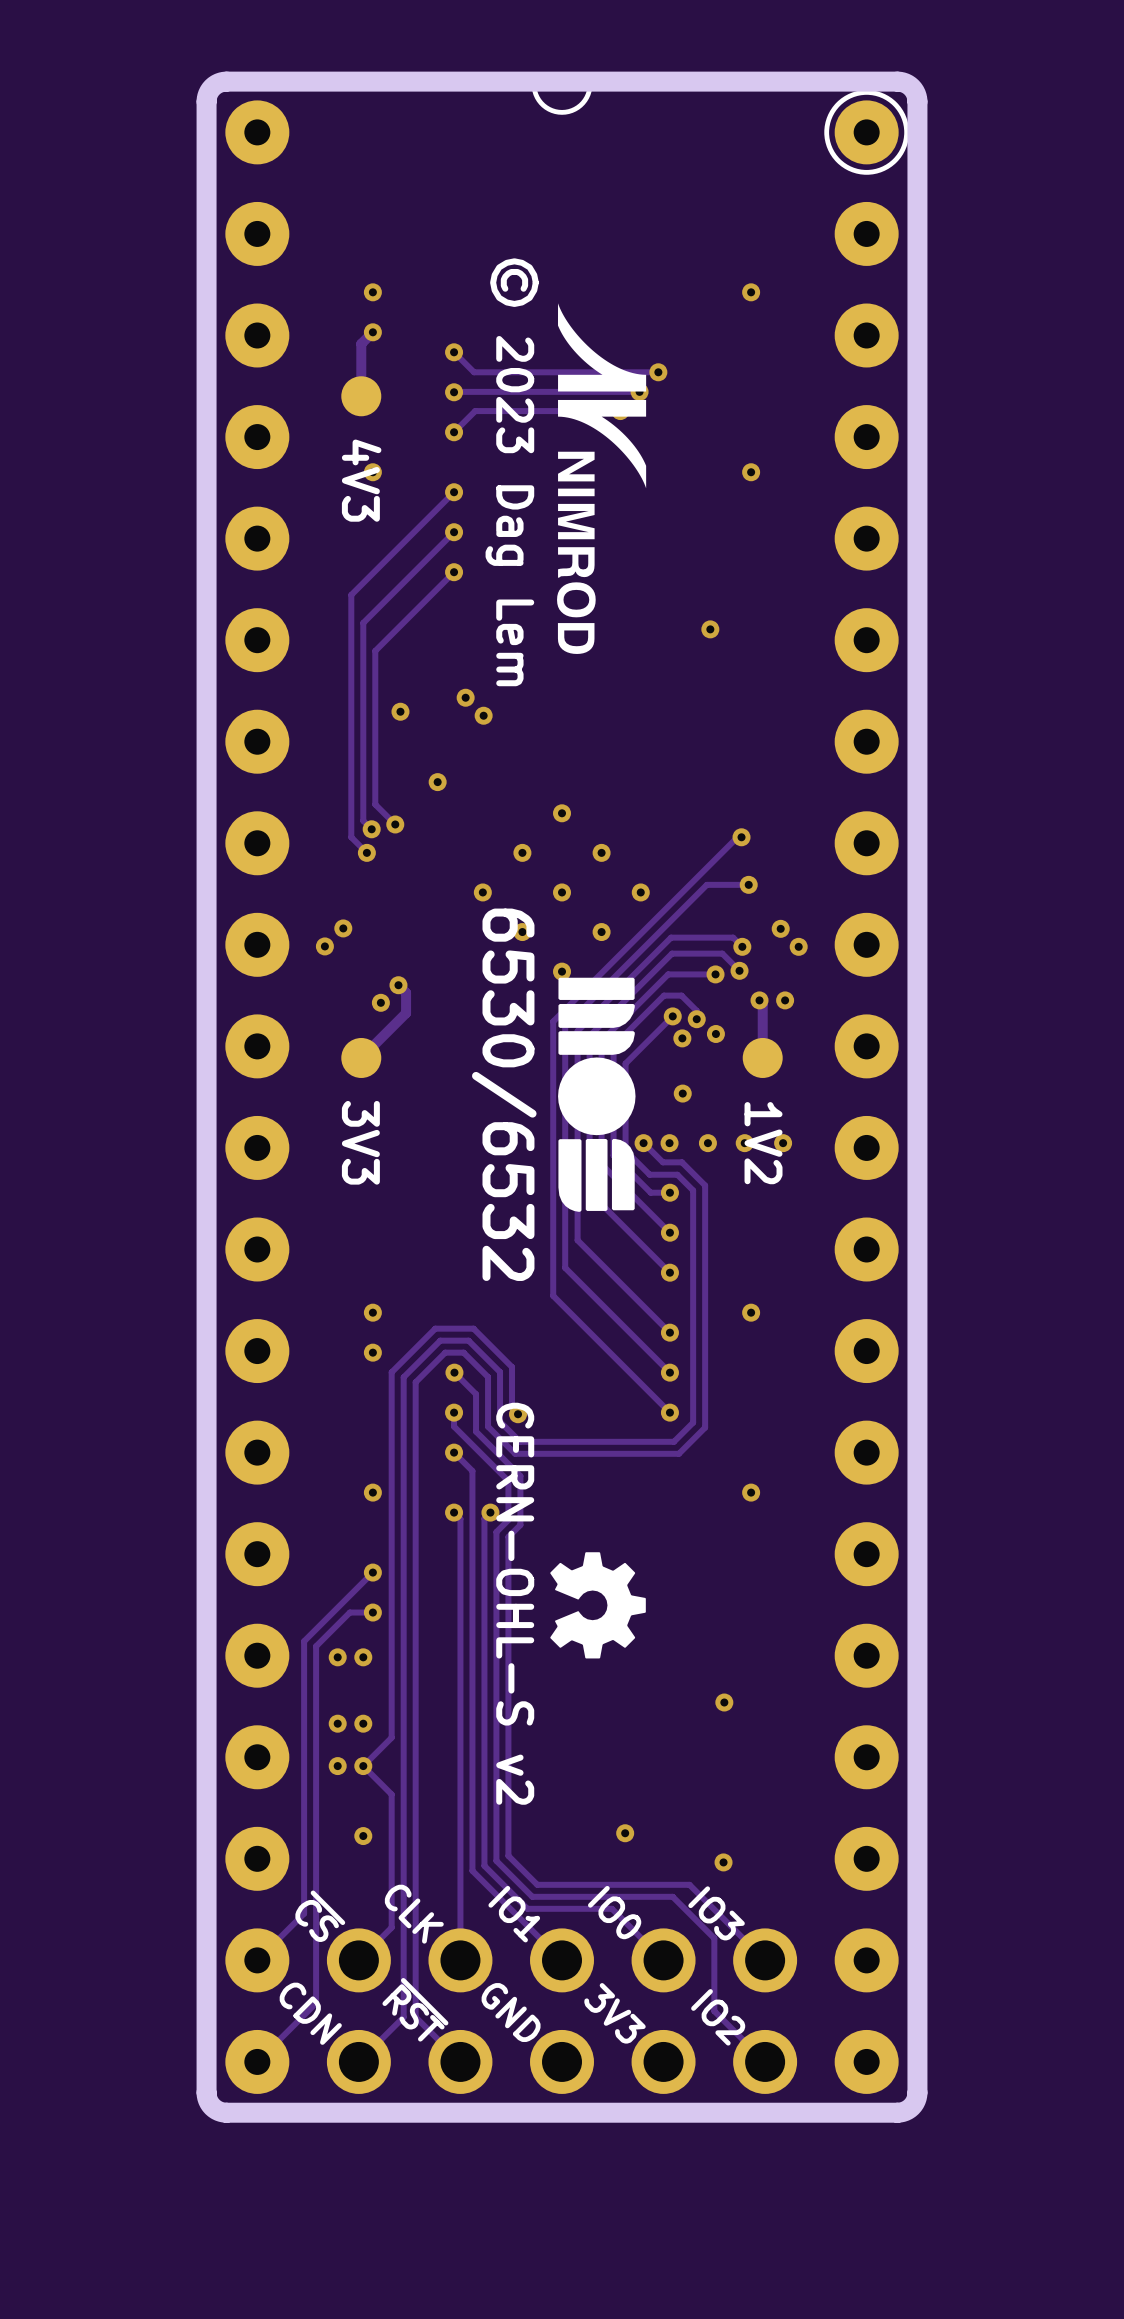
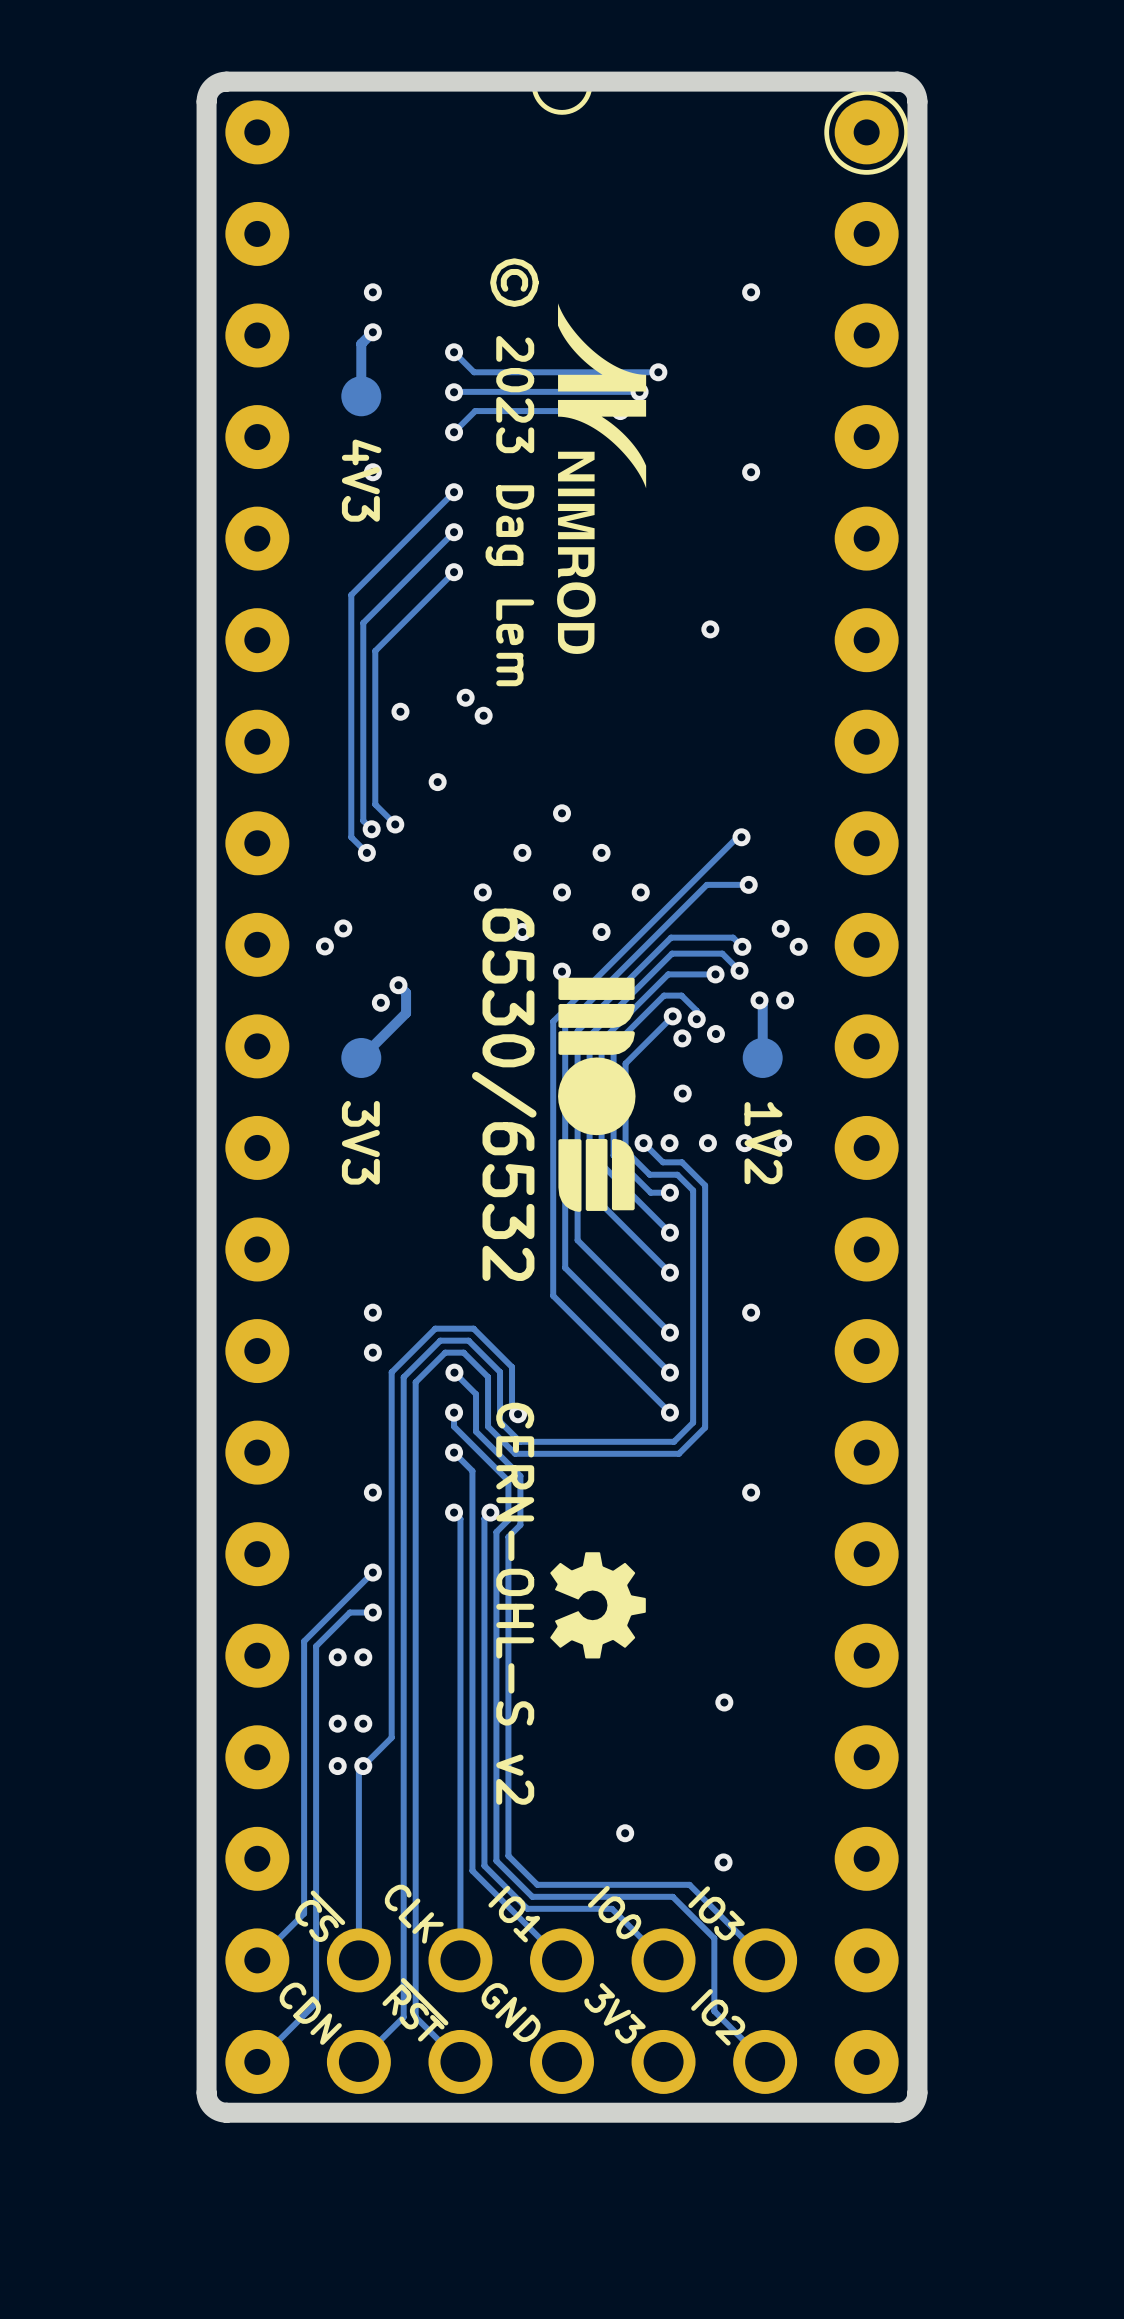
track: (363, 1766) (391, 1794) (391, 1927) (358, 1960) -> (363, 1766) (358, 1770) (358, 1960)
via: (363, 1836) -> none

